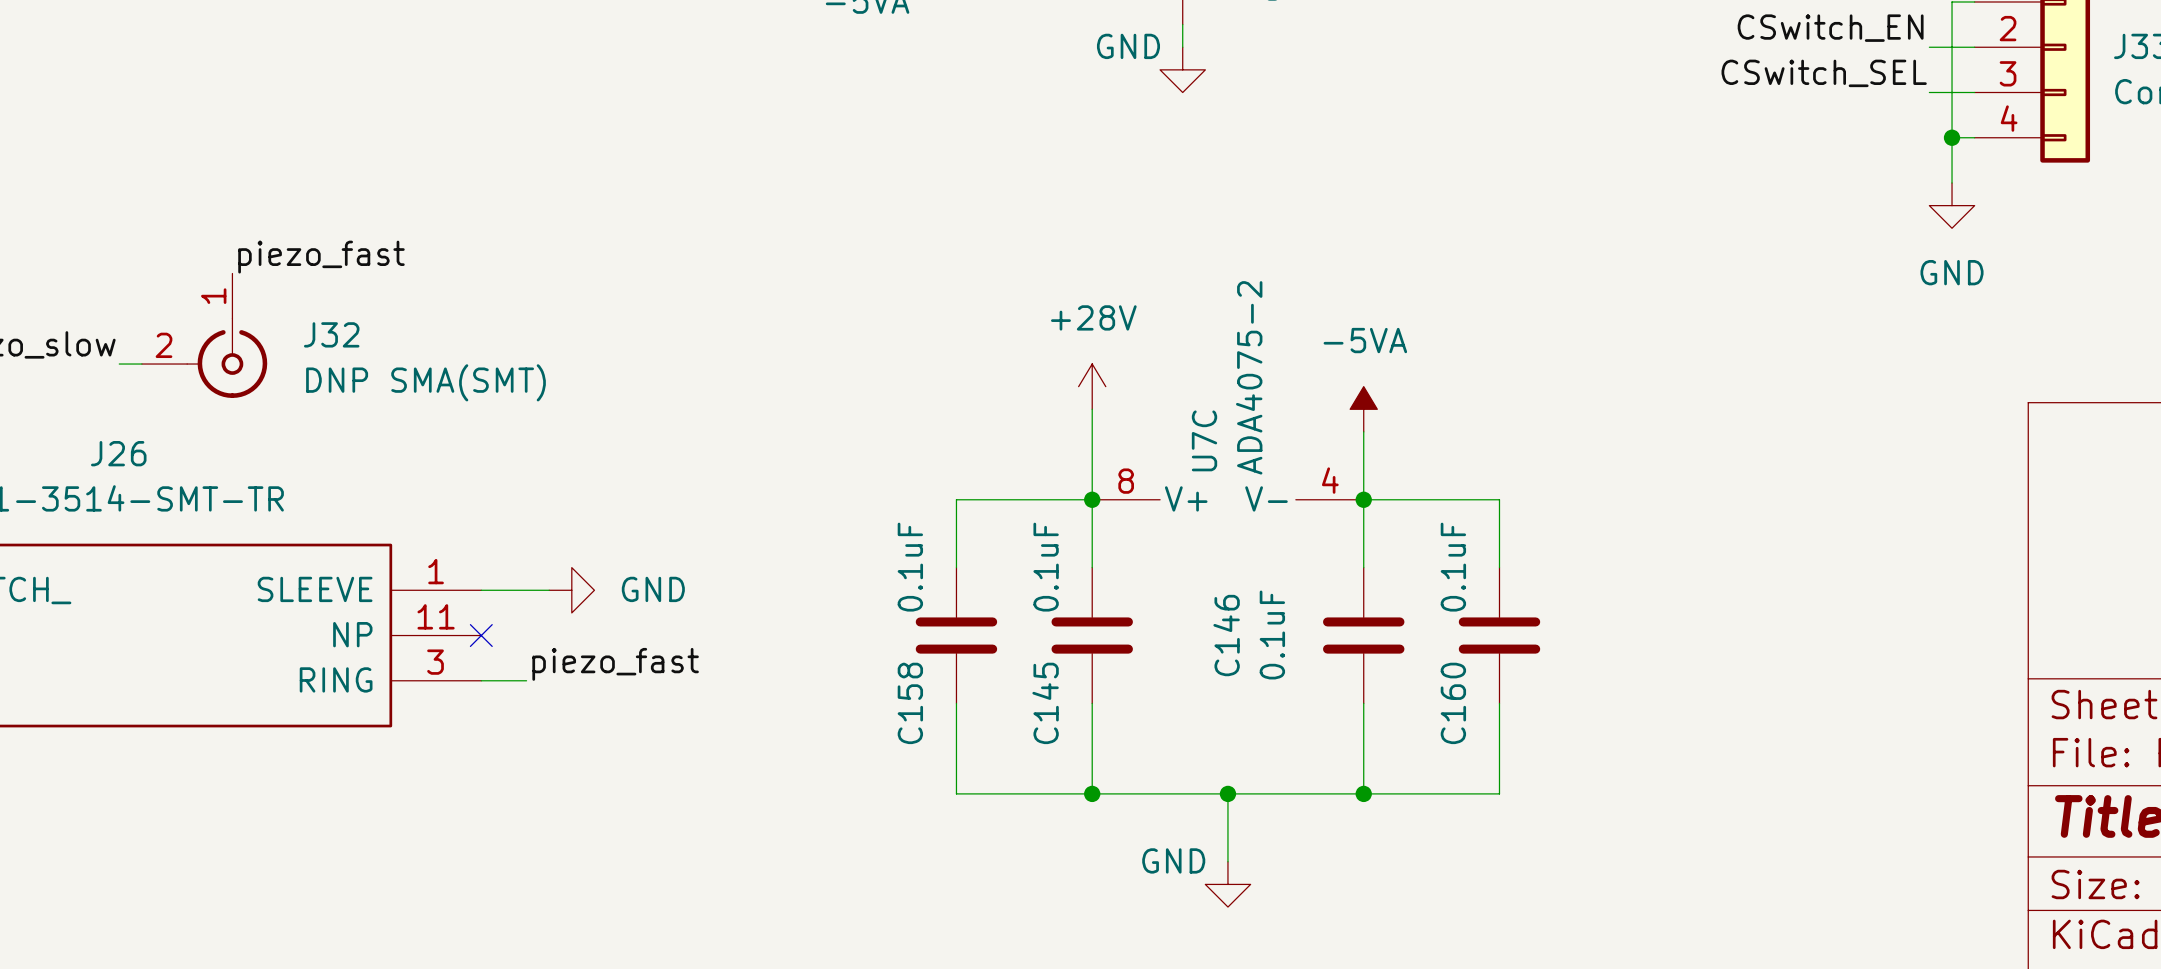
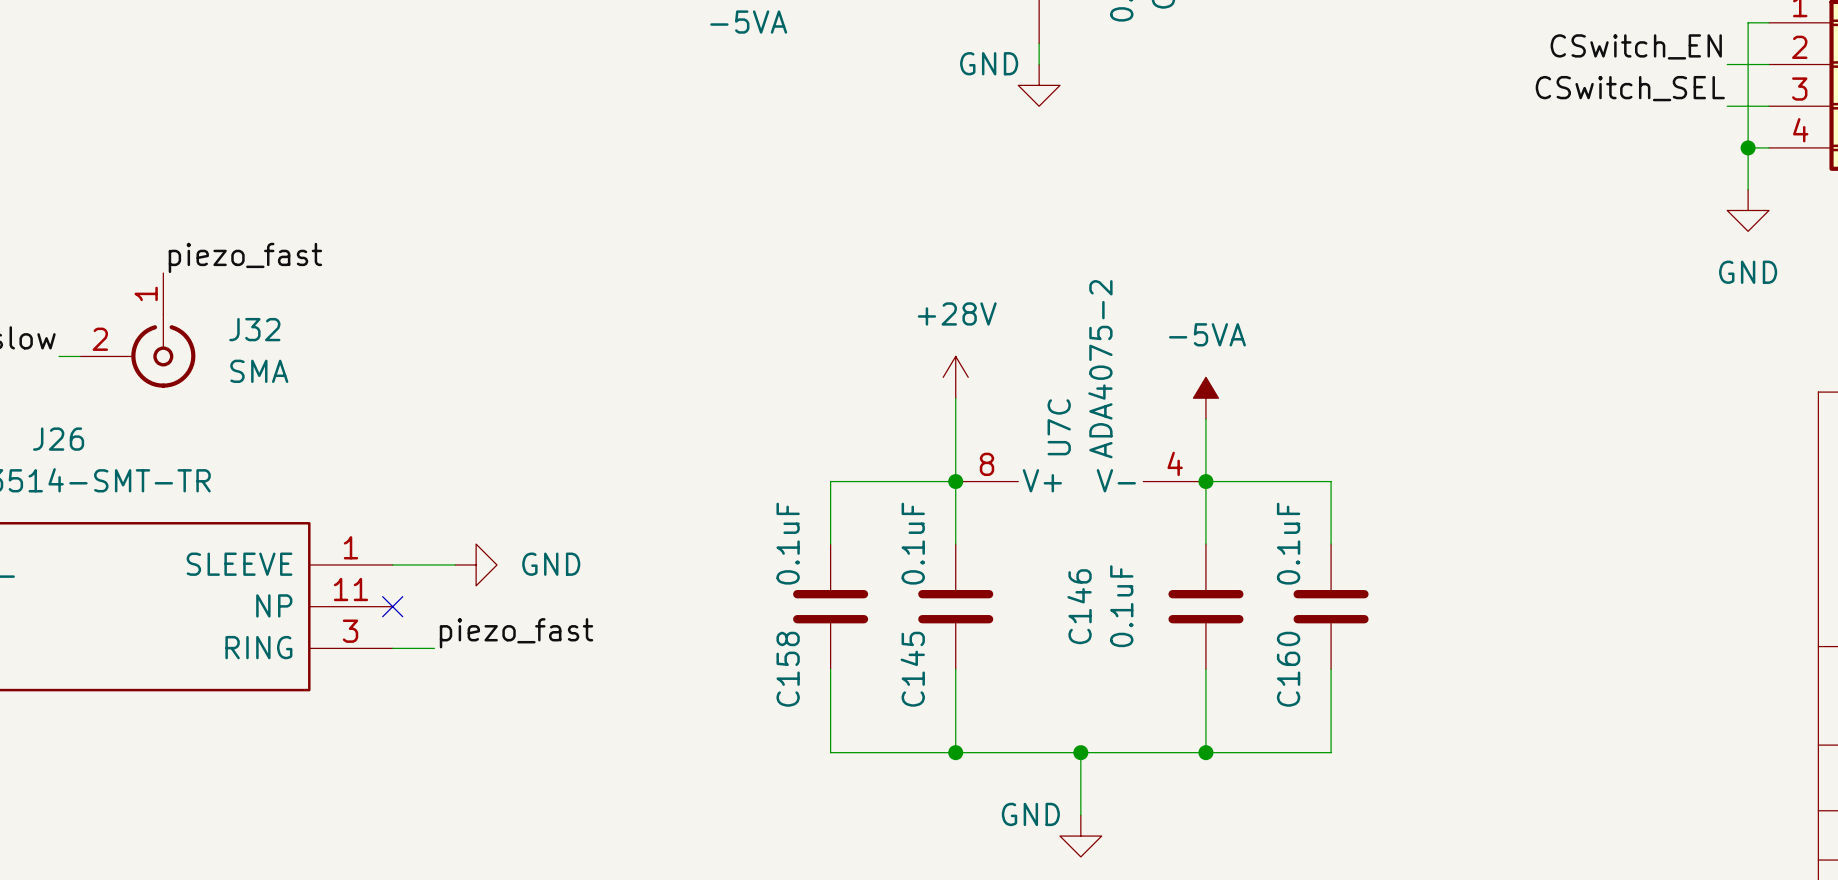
J32 value: DNP SMA(SMT) (425, 382) -> SMA (259, 371)

